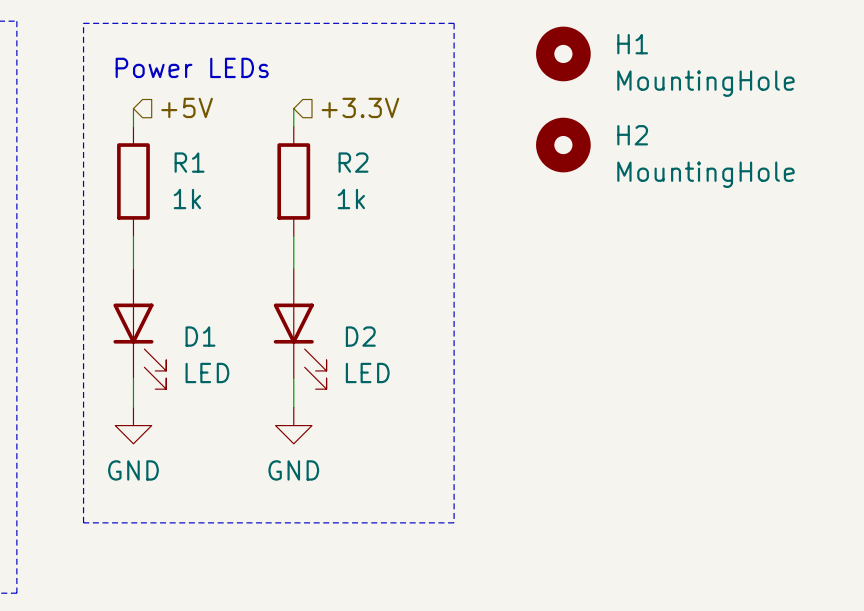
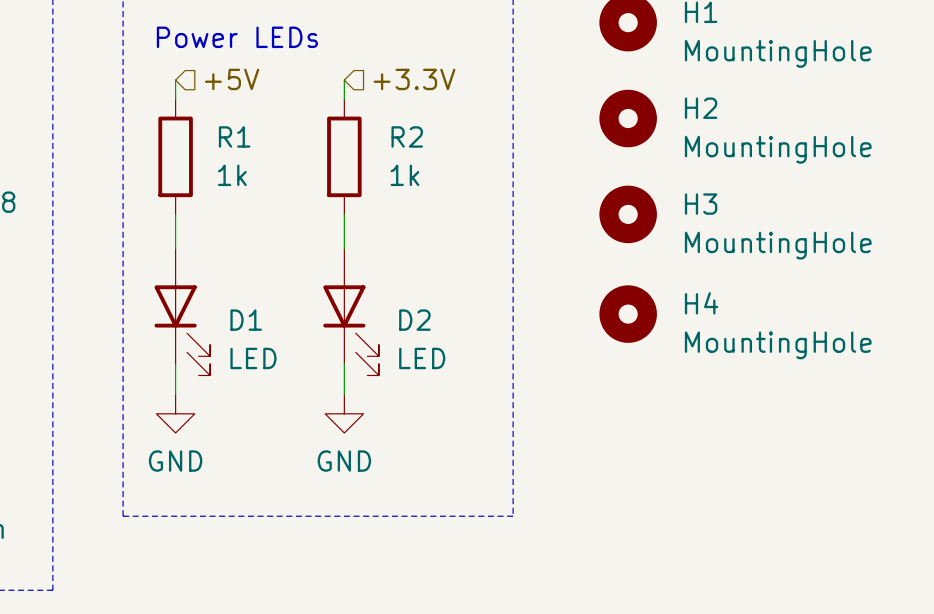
H3: none -> MountingHole (628, 214)
H4: none -> MountingHole (628, 314)

